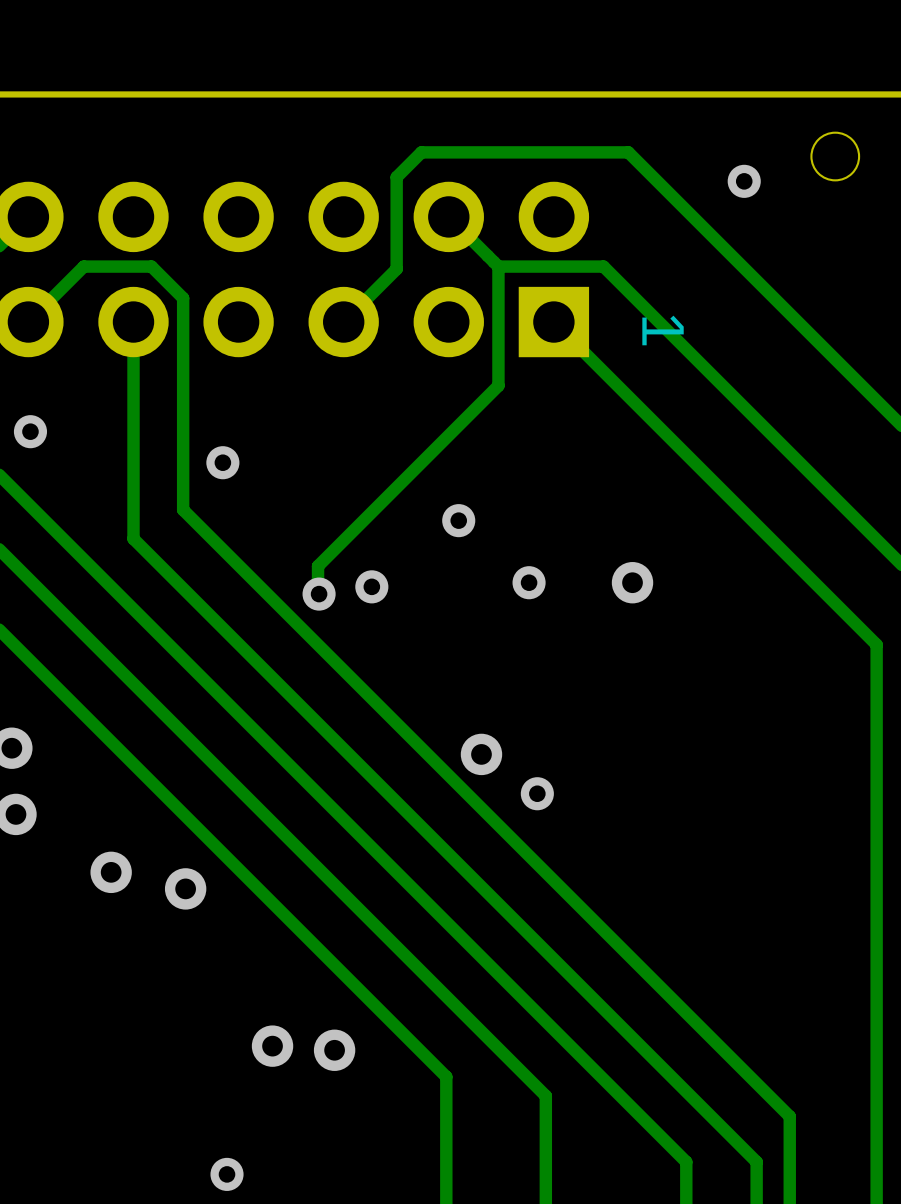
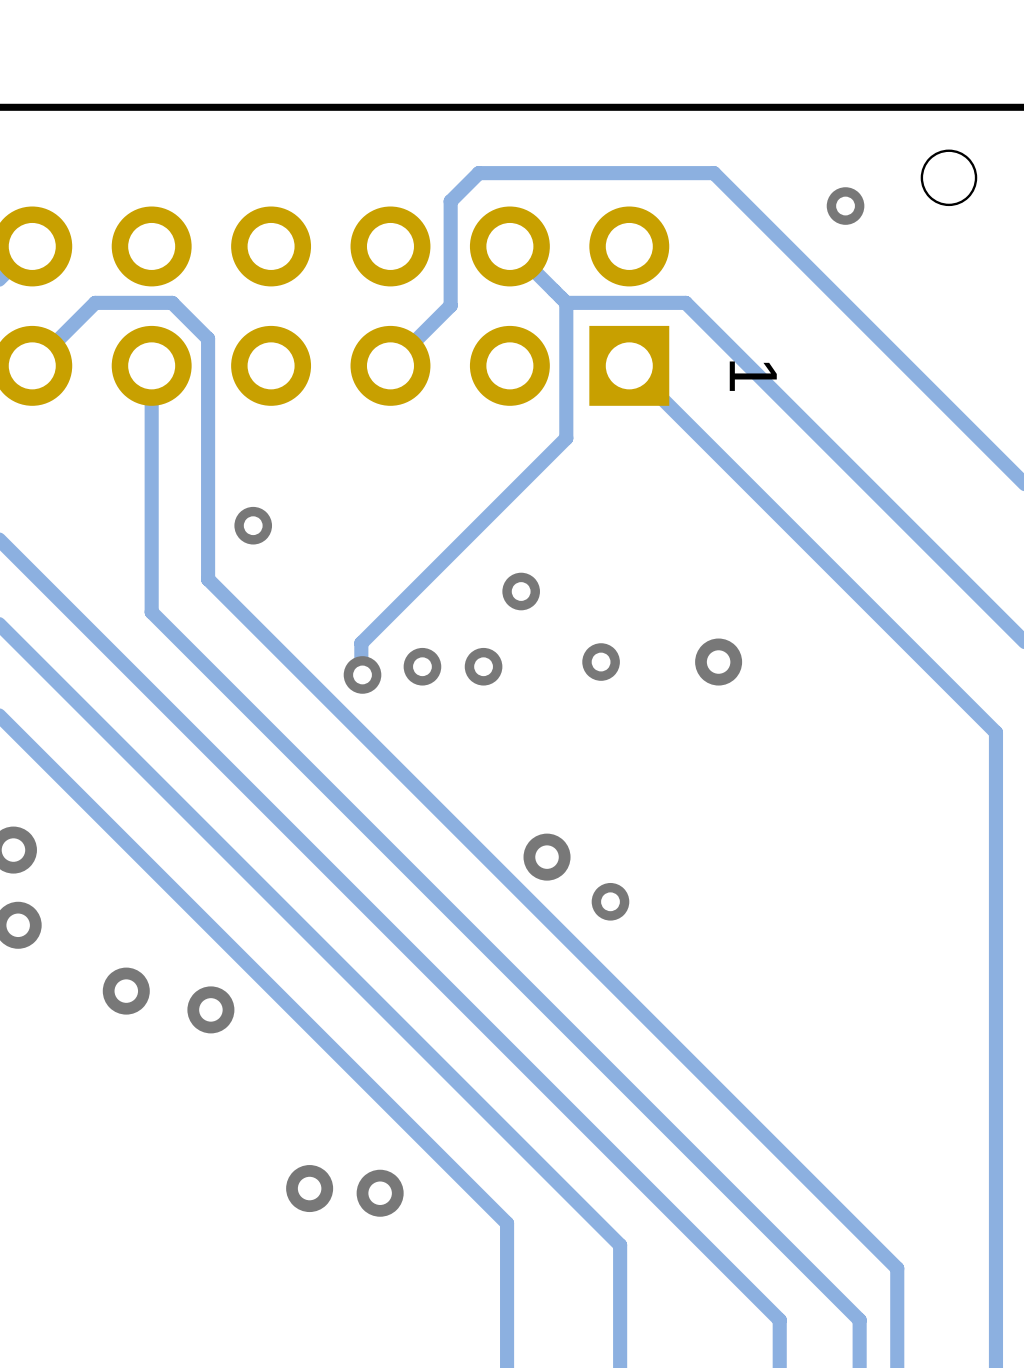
via: (30, 431) -> none
via: none -> (483, 666)
via: (227, 1174) -> none

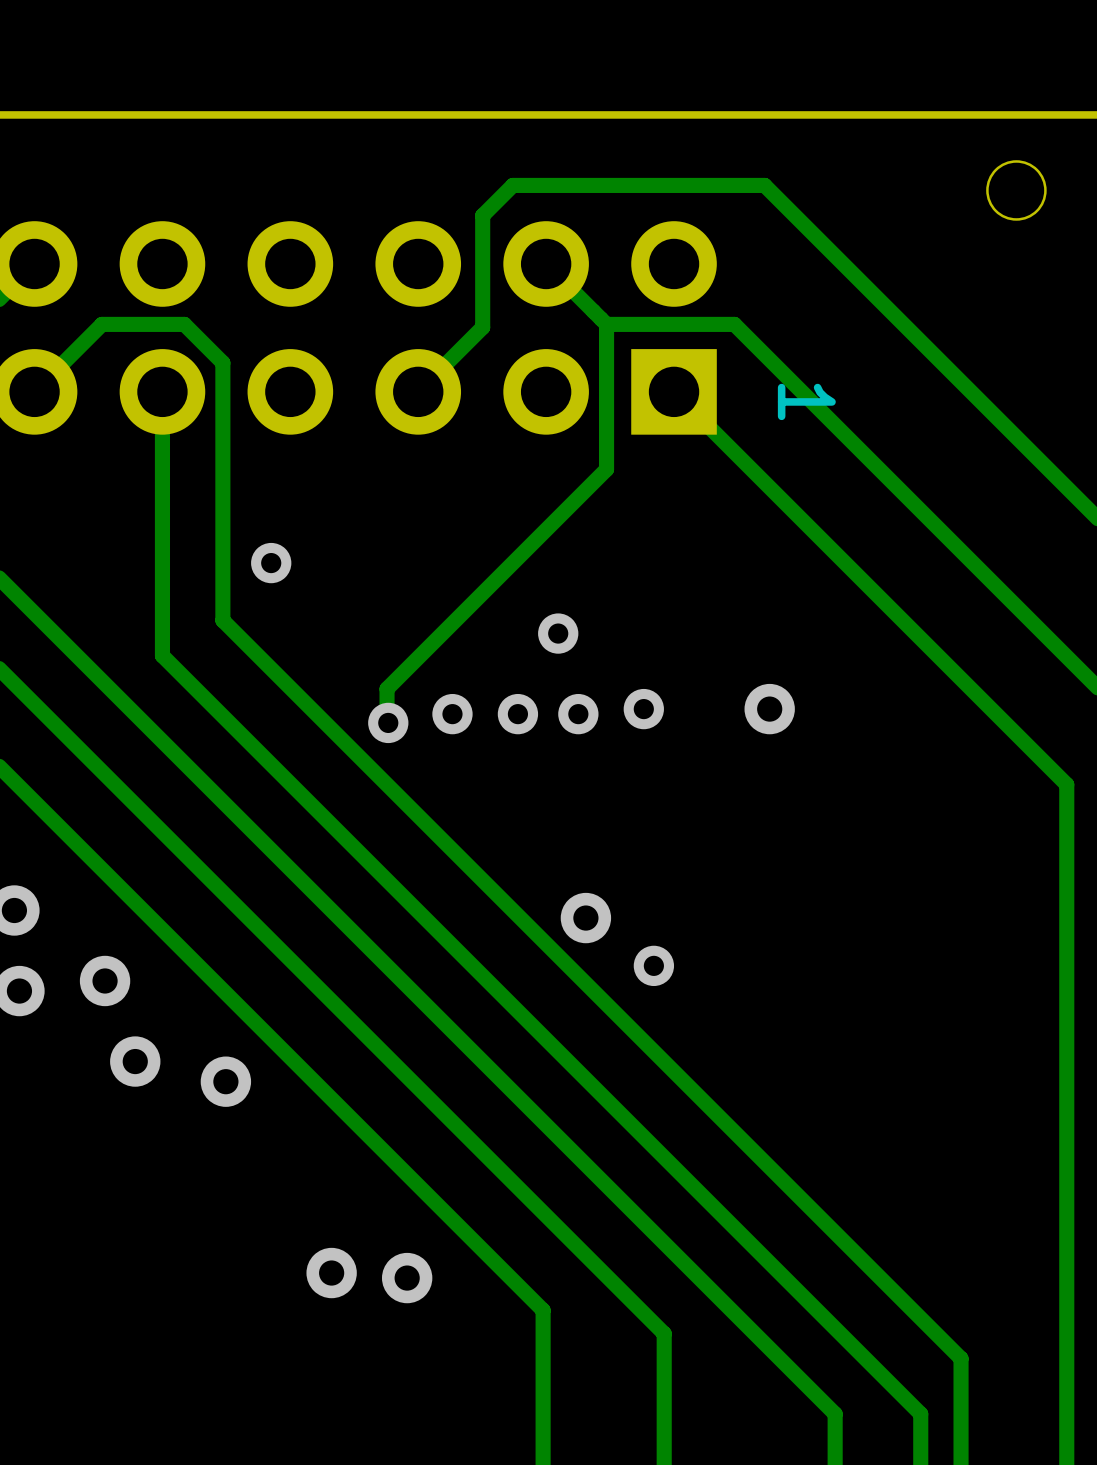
via: (845, 206) -> none
via: none -> (578, 714)
via: none -> (105, 980)

